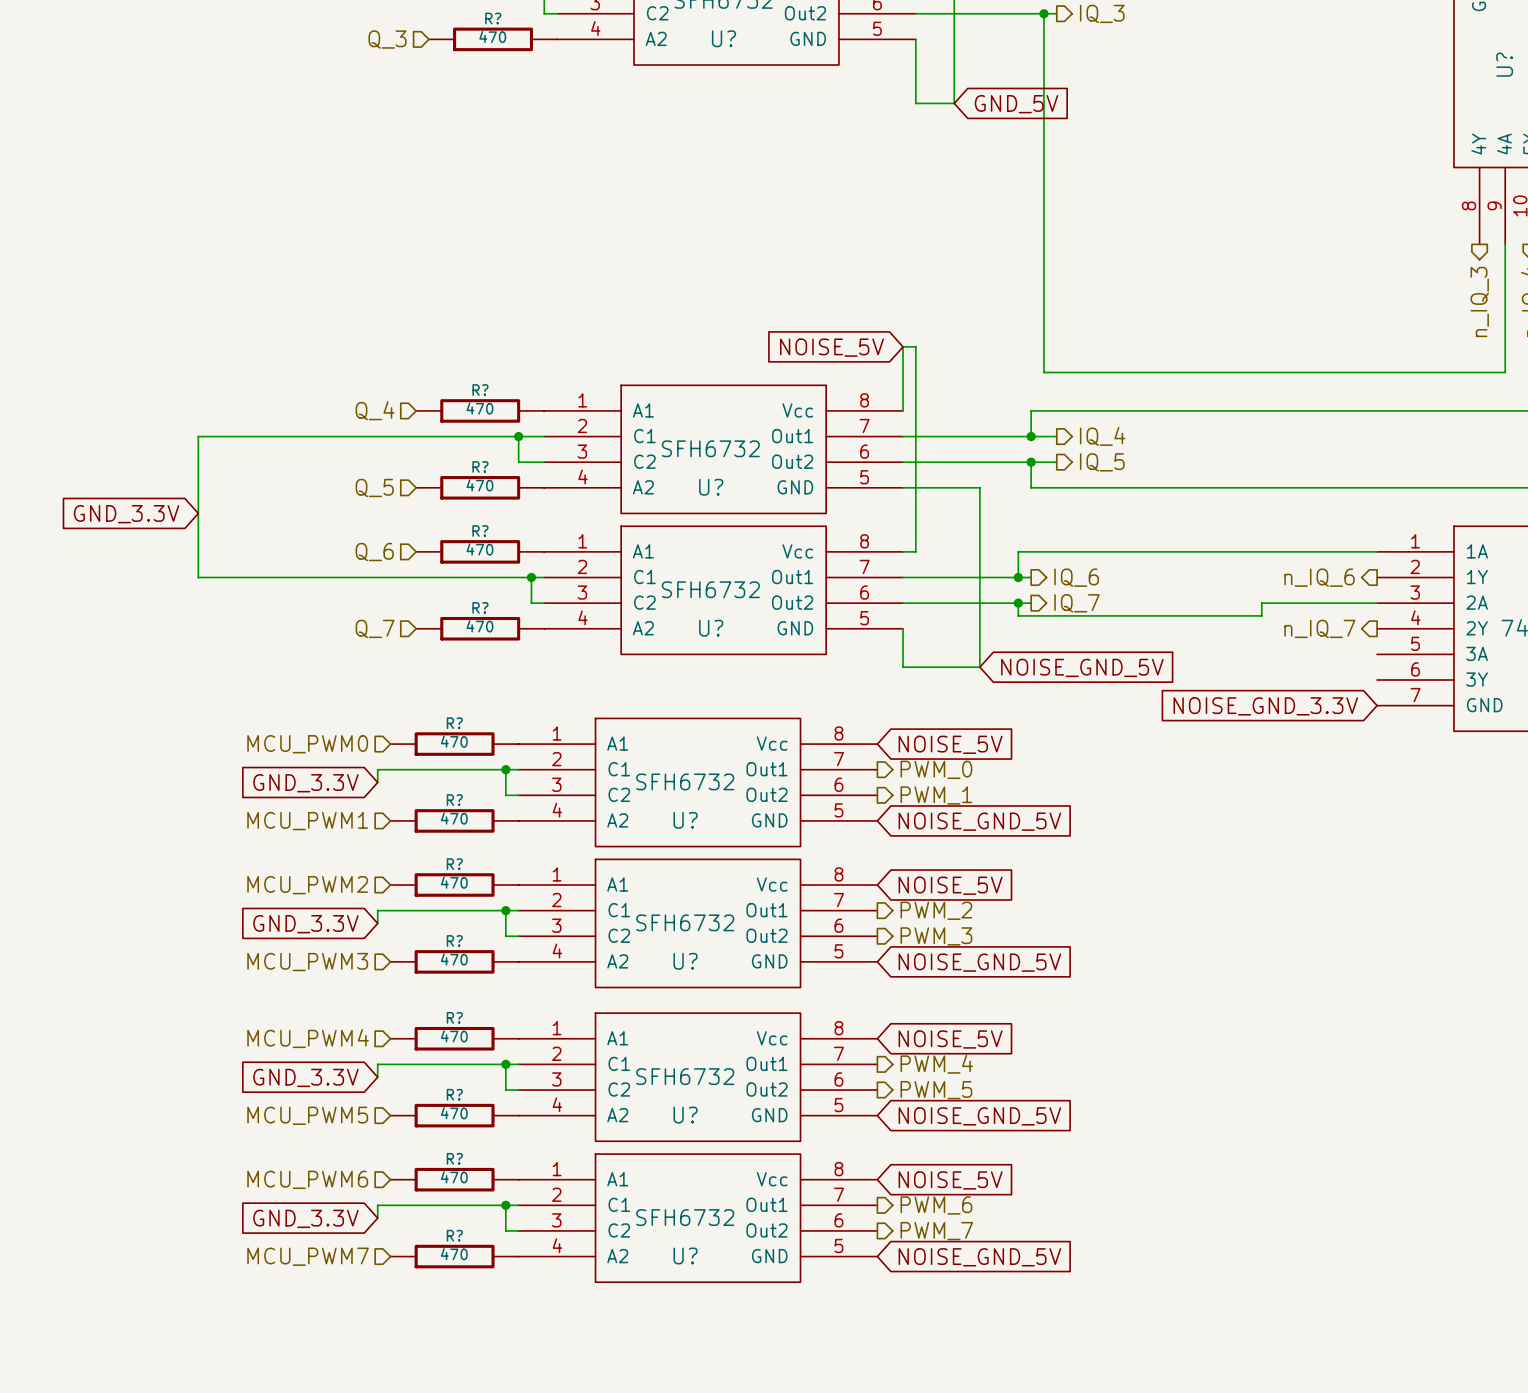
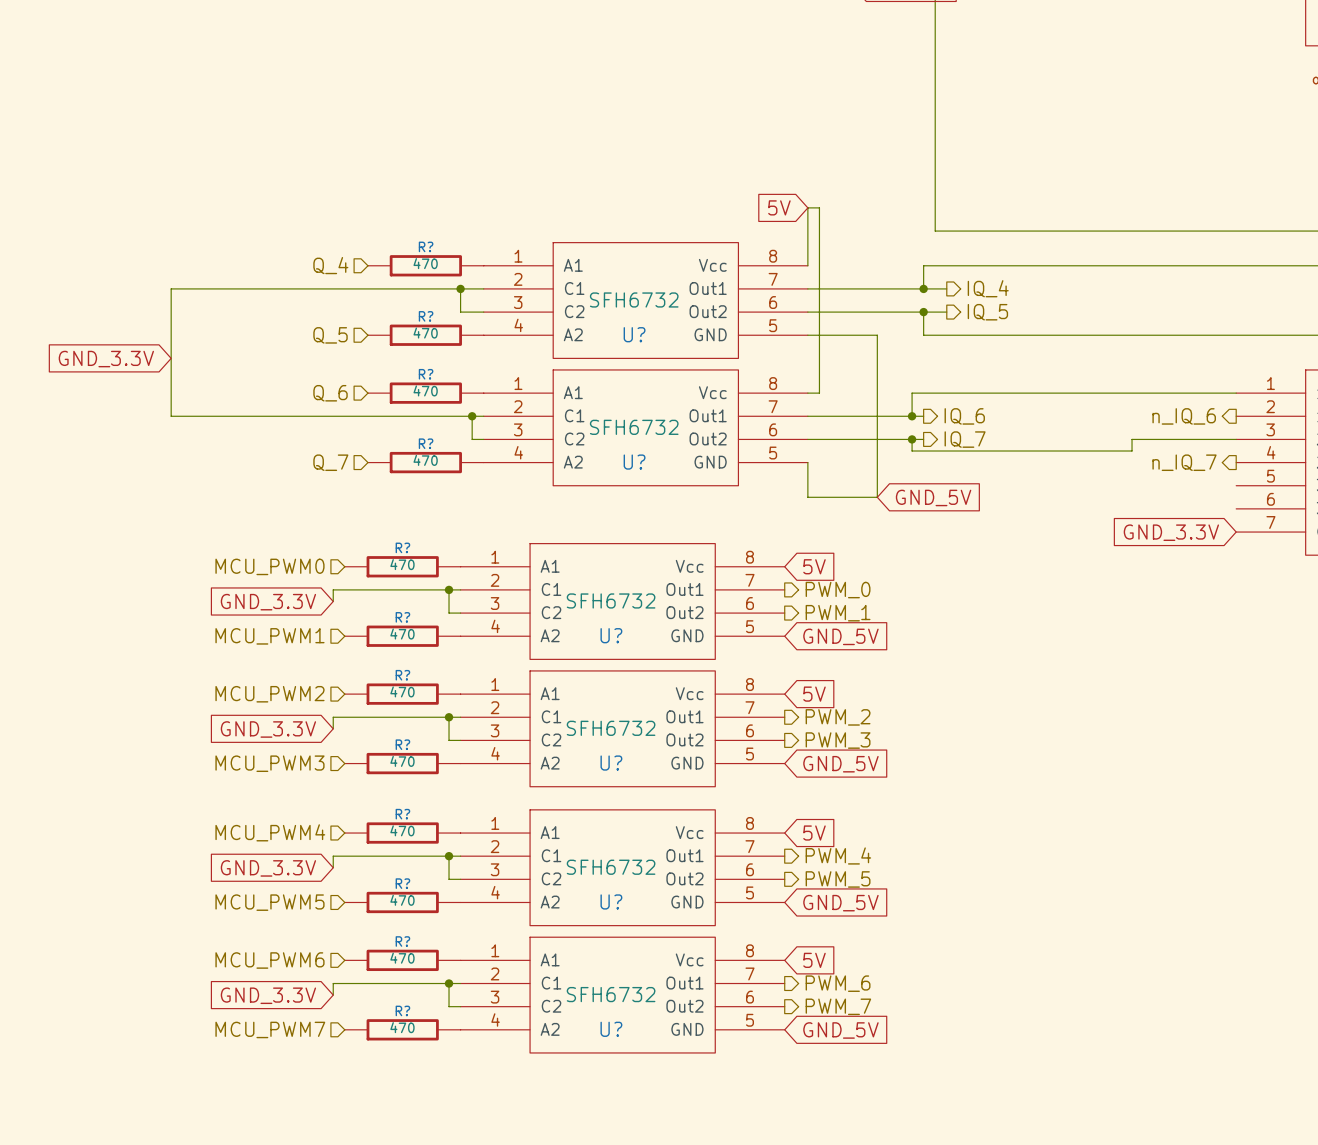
global label: NOISE_5V (832, 347) -> 5V (779, 207)
global label: NOISE_GND_5V (1082, 667) -> GND_5V (933, 497)
global label: NOISE_GND_3.3V (1265, 706) -> GND_3.3V (1171, 532)
global label: NOISE_5V (950, 744) -> 5V (814, 566)
global label: NOISE_GND_5V (979, 821) -> GND_5V (840, 636)
global label: NOISE_5V (950, 885) -> 5V (814, 694)
global label: NOISE_GND_5V (979, 962) -> GND_5V (840, 764)
global label: NOISE_5V (950, 1039) -> 5V (814, 833)
global label: NOISE_GND_5V (979, 1116) -> GND_5V (840, 903)
global label: NOISE_5V (950, 1180) -> 5V (814, 960)
global label: NOISE_GND_5V (979, 1257) -> GND_5V (840, 1030)

